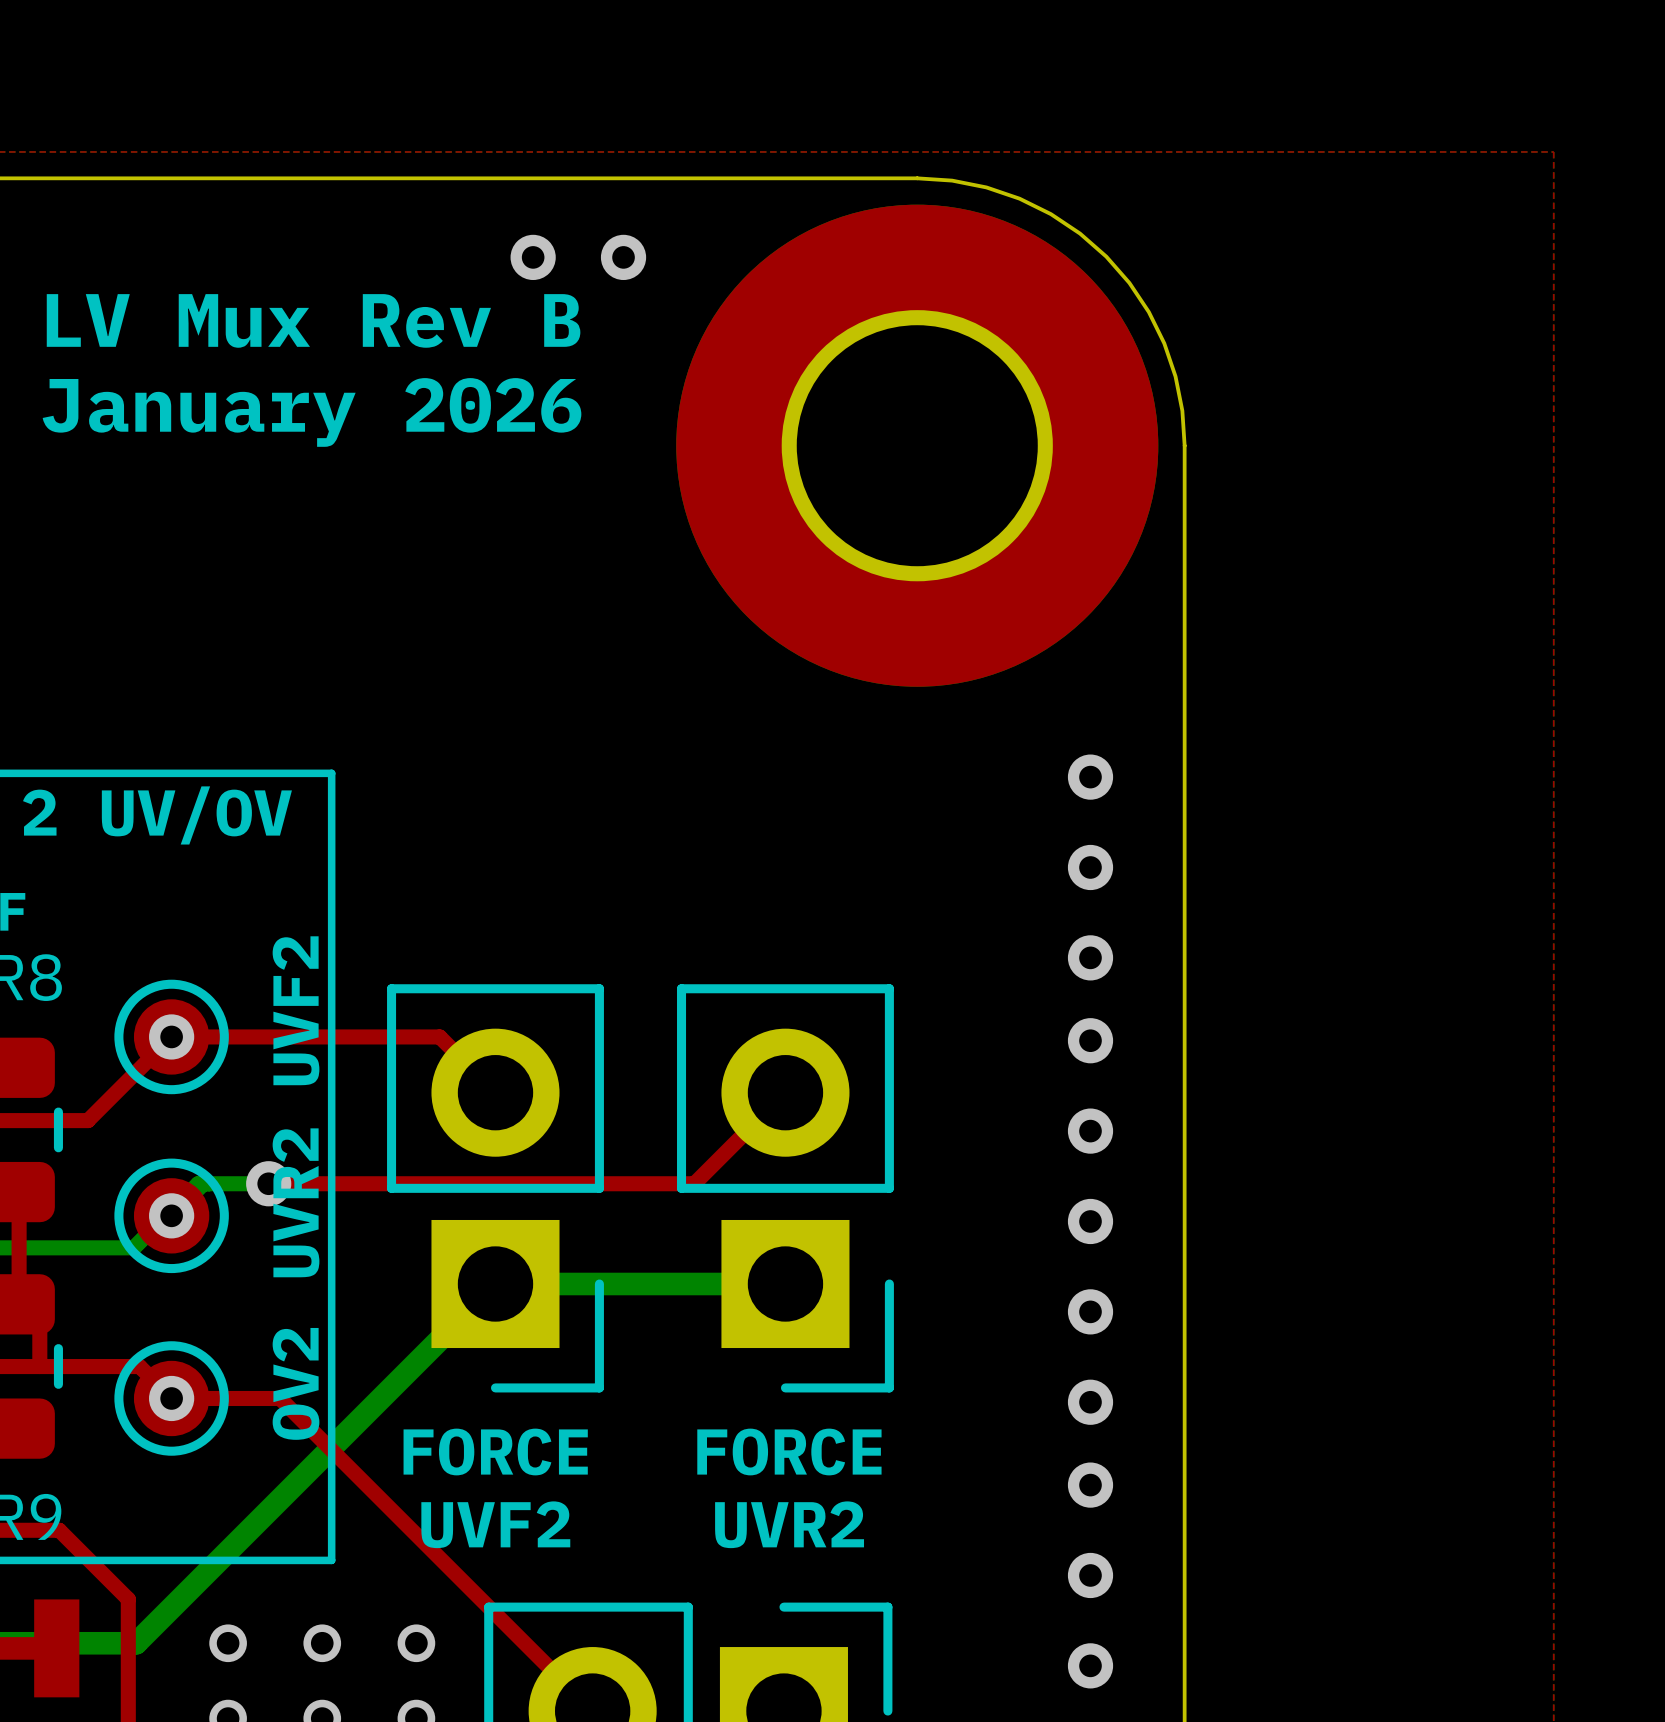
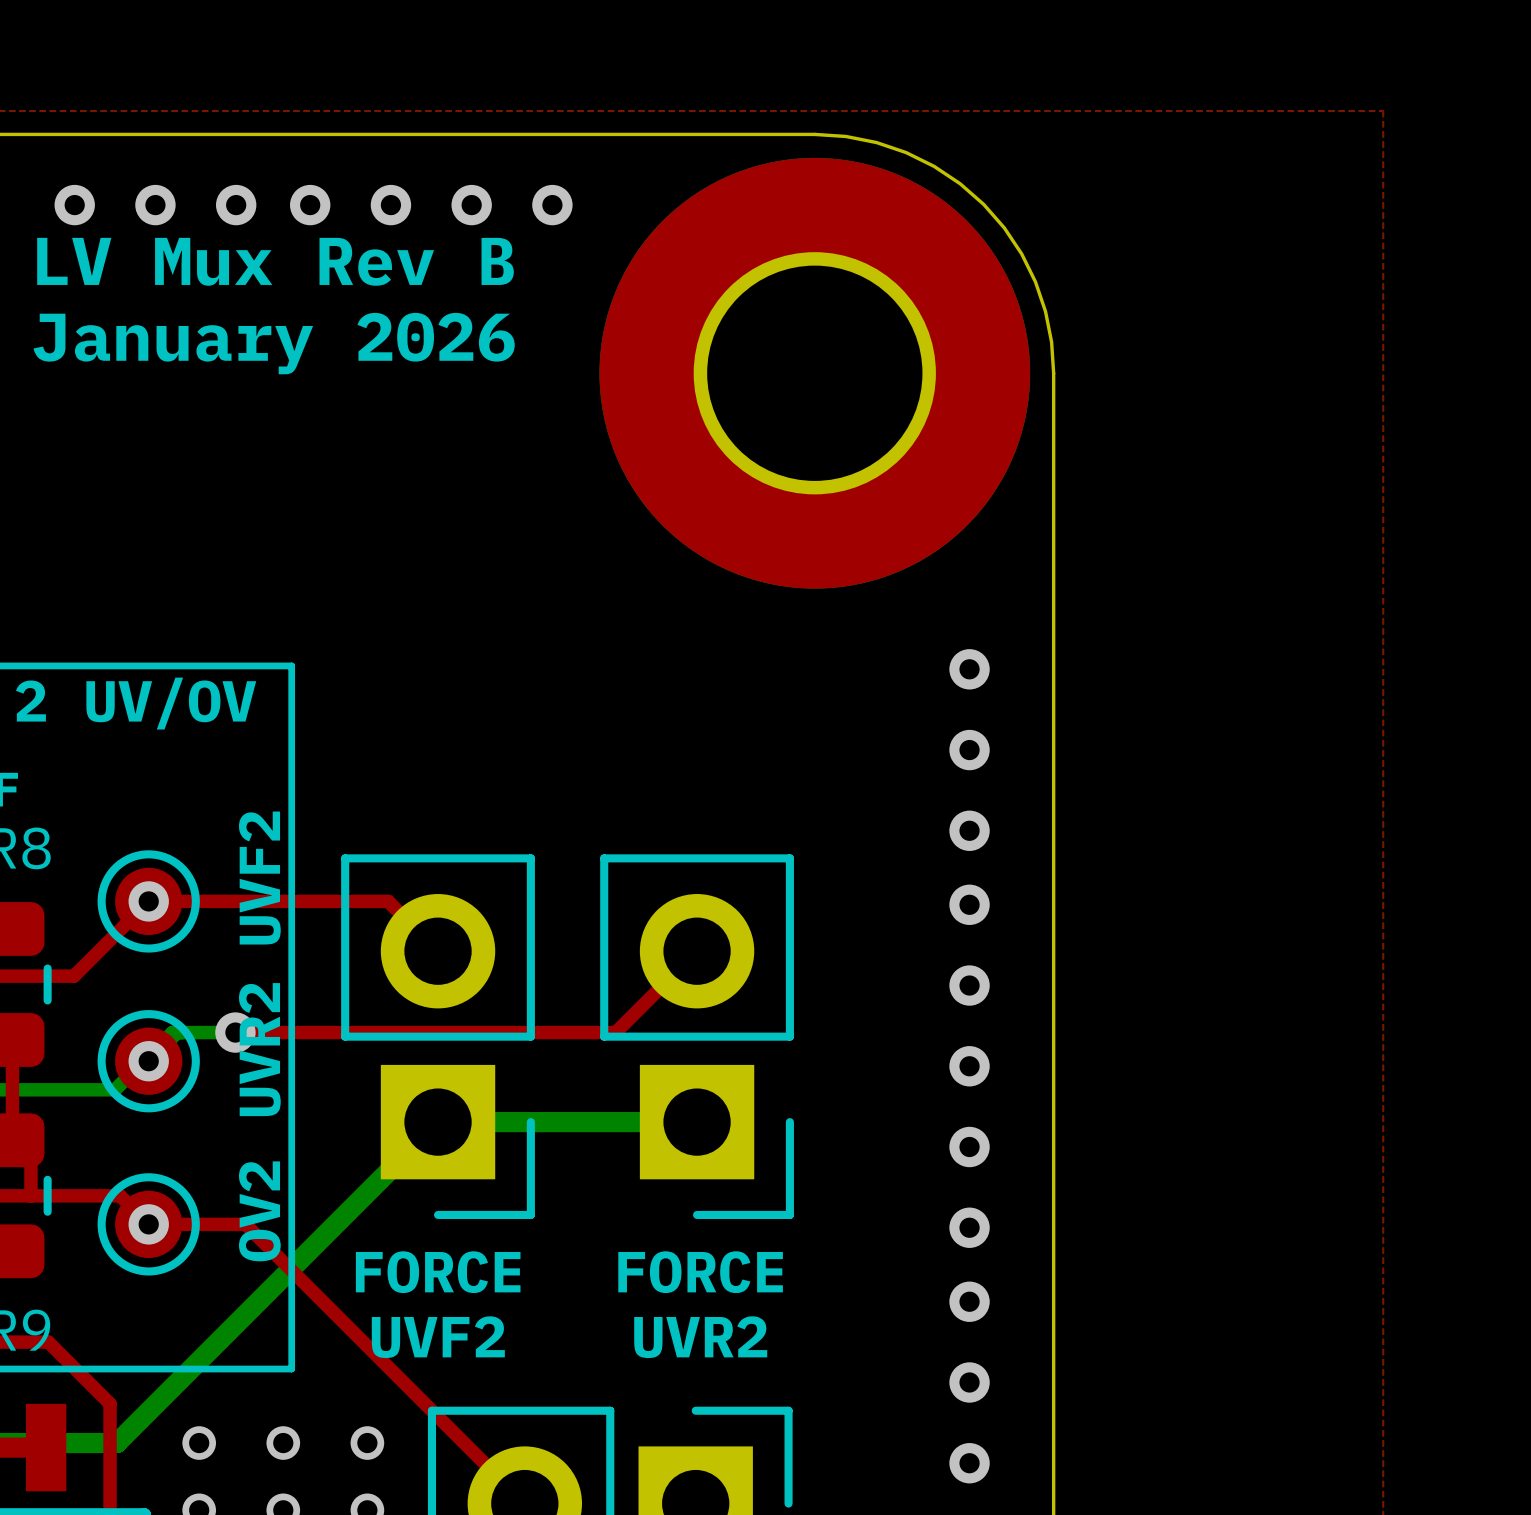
via: none -> (74, 205)
via: none -> (155, 205)
via: none -> (236, 205)
via: none -> (310, 205)
via: none -> (390, 205)

